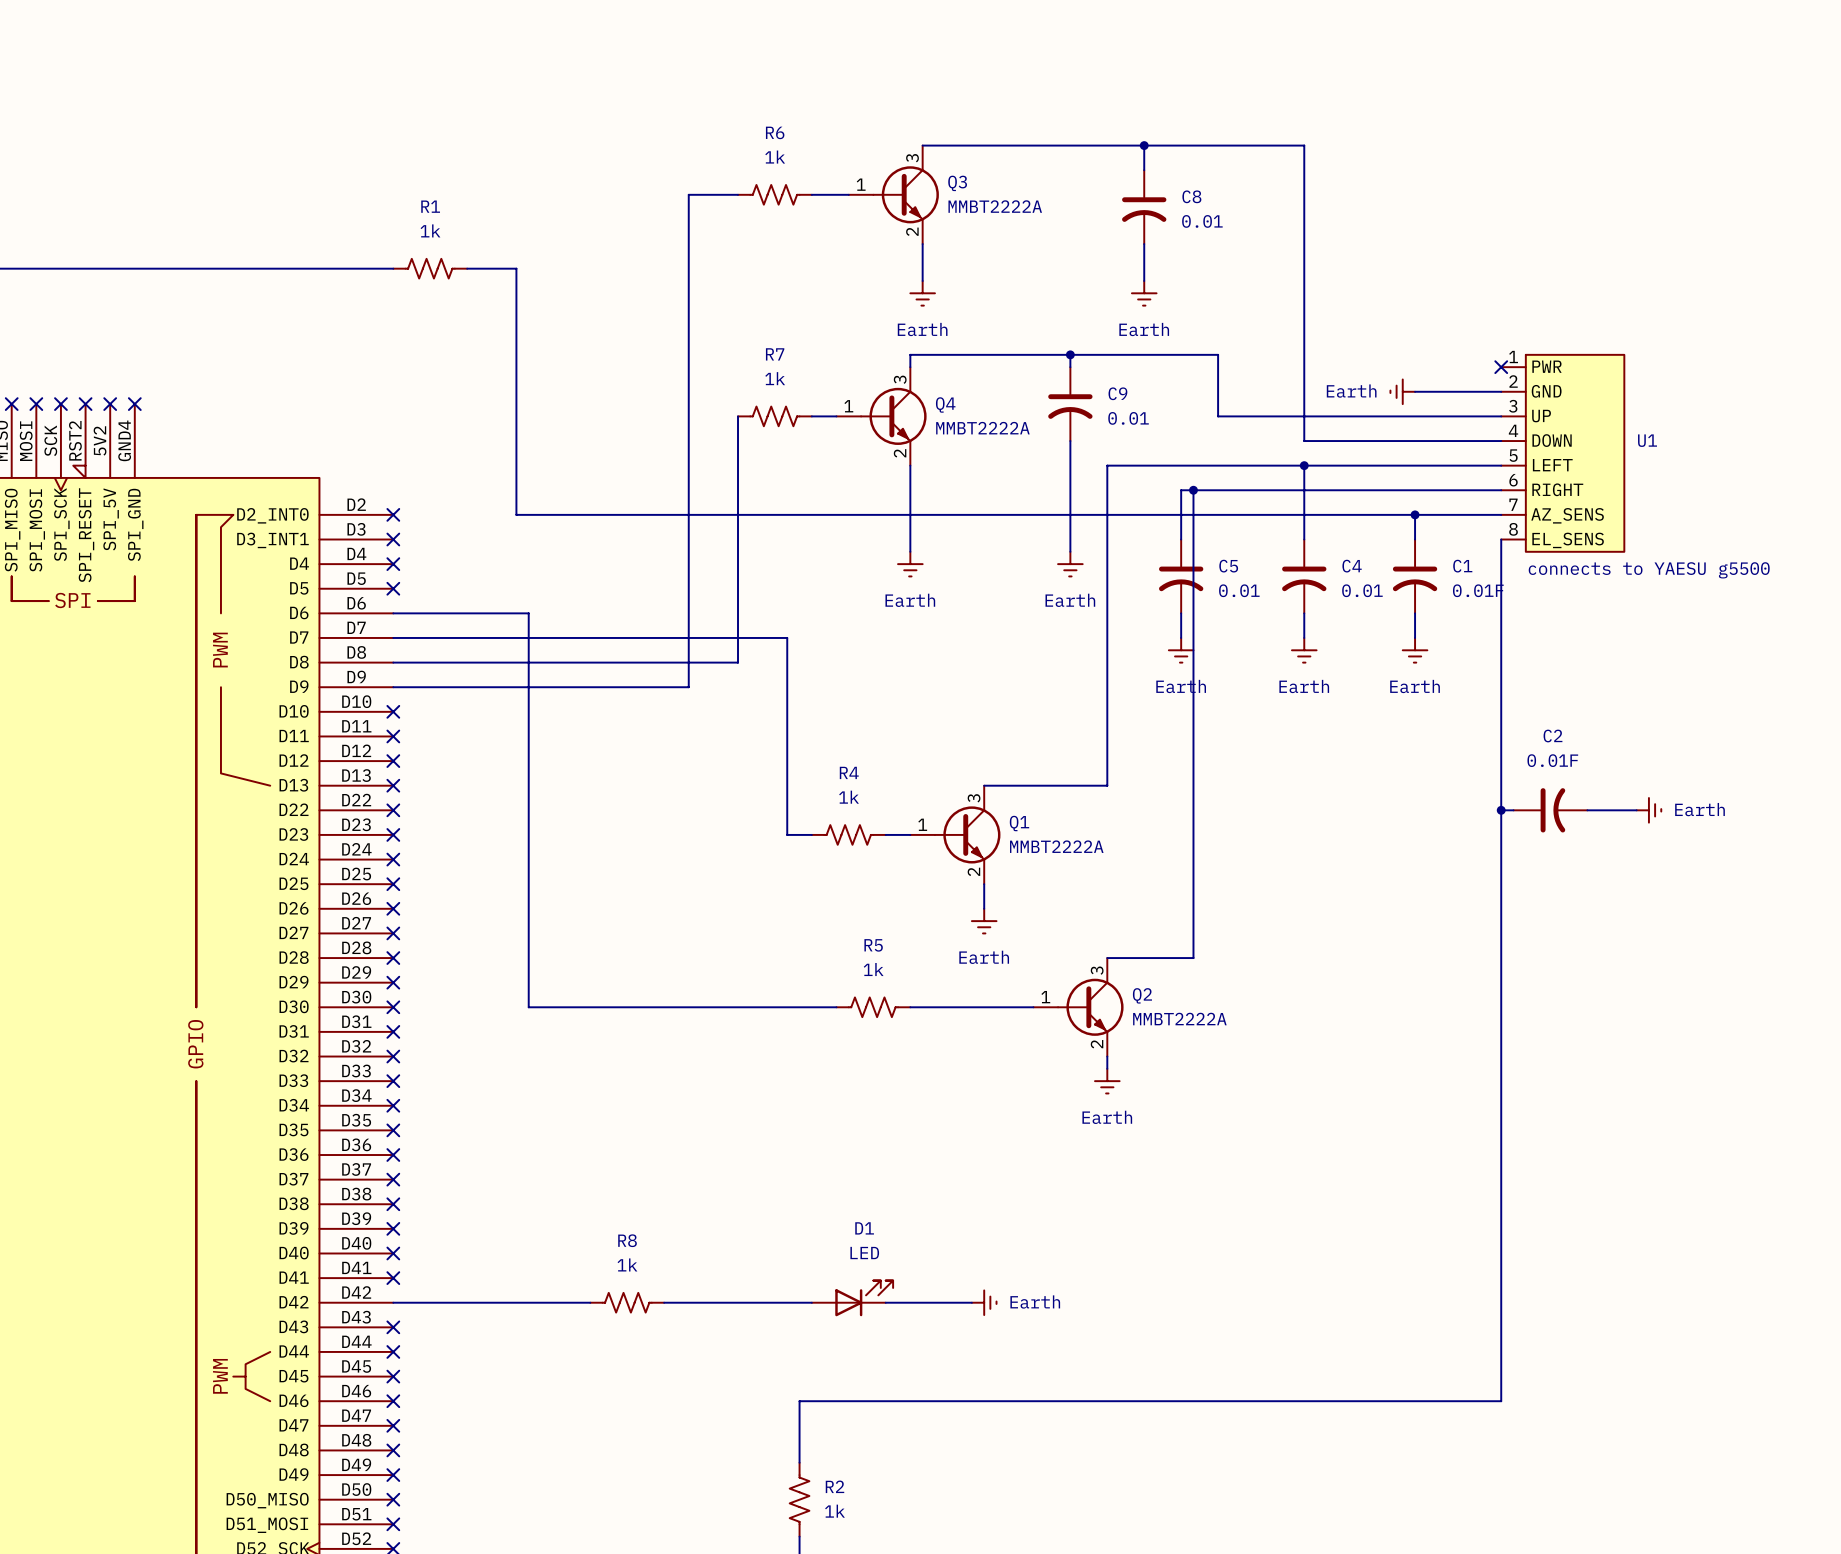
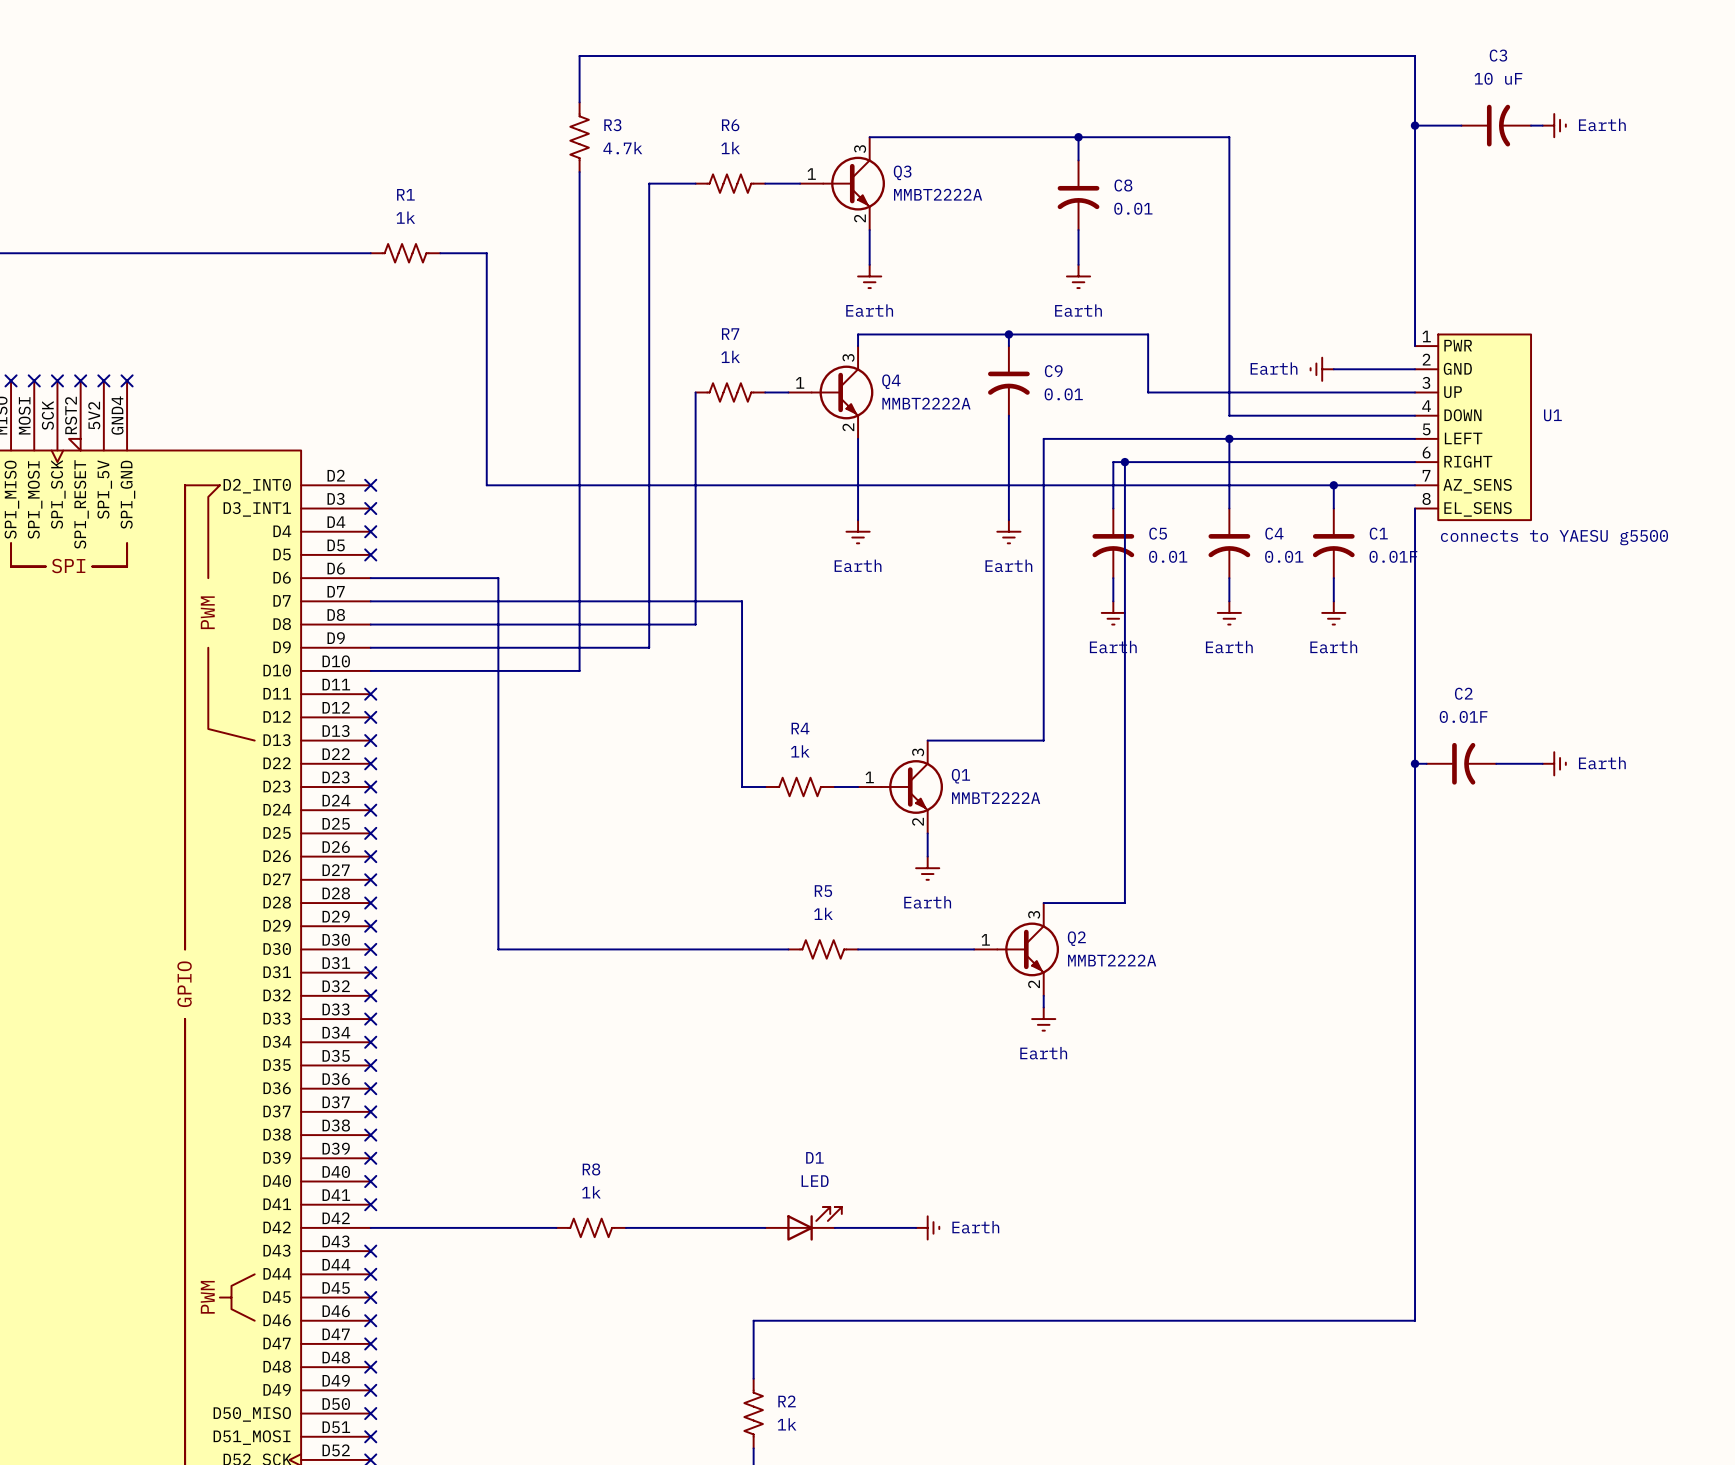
wire: none -> (579, 102) (579, 56) (1415, 56) (1415, 346)
wire: none -> (1415, 125) (1461, 125)
junction: none -> (1415, 125)
C3: none -> 10 uF (1496, 125)
wire: none -> (1531, 125) (1542, 125)
power symbol: none -> Earth (1554, 125)
R3: none -> 4.7k (579, 137)
wire: none -> (579, 172) (579, 670) (370, 670)
no-connect mark: (1501, 367) -> none
no-connect mark: (393, 711) -> none

